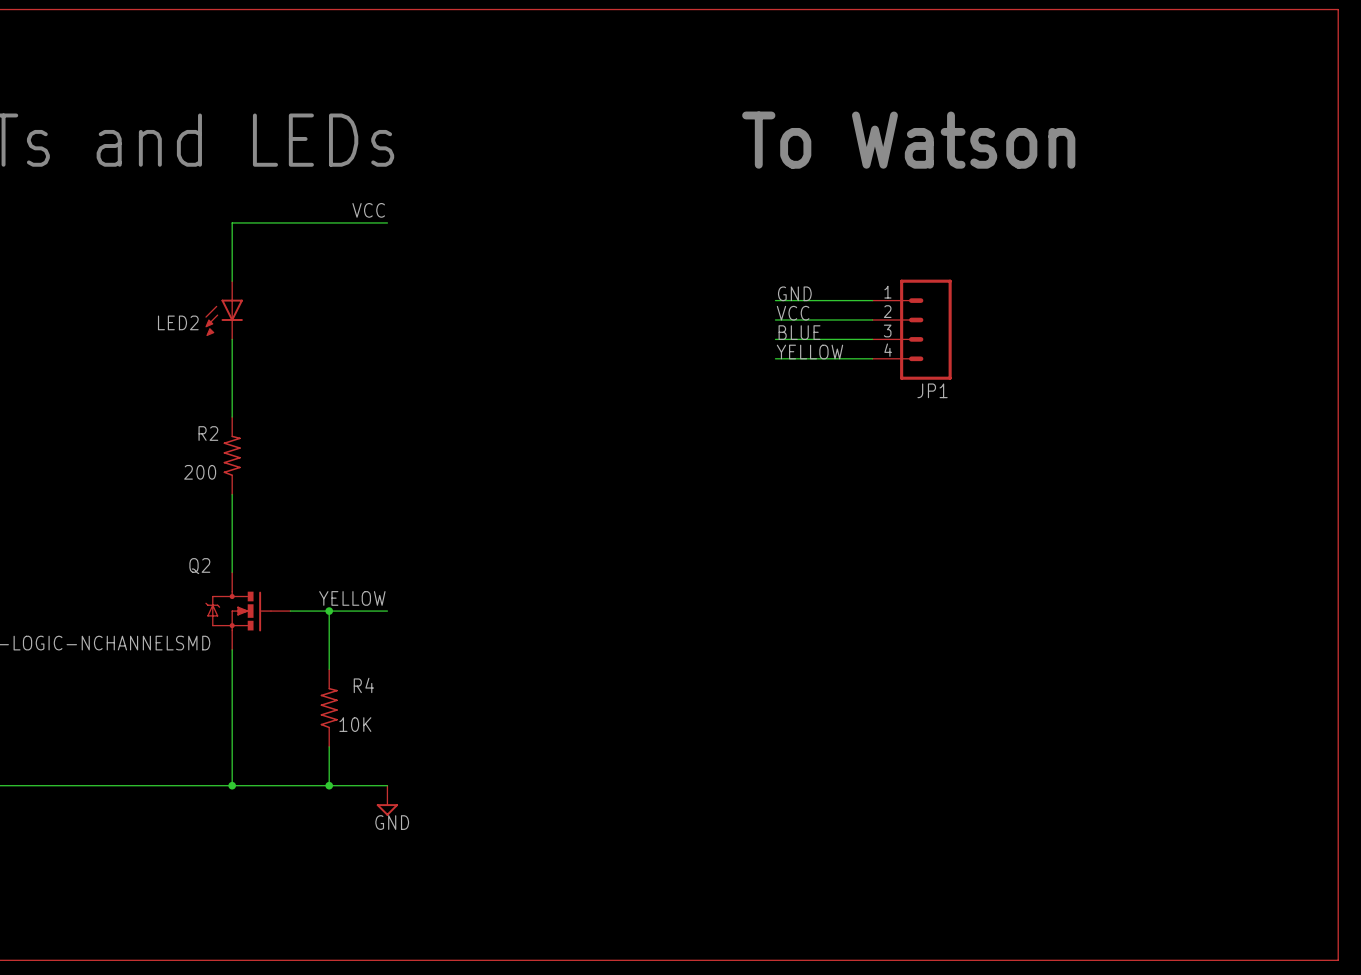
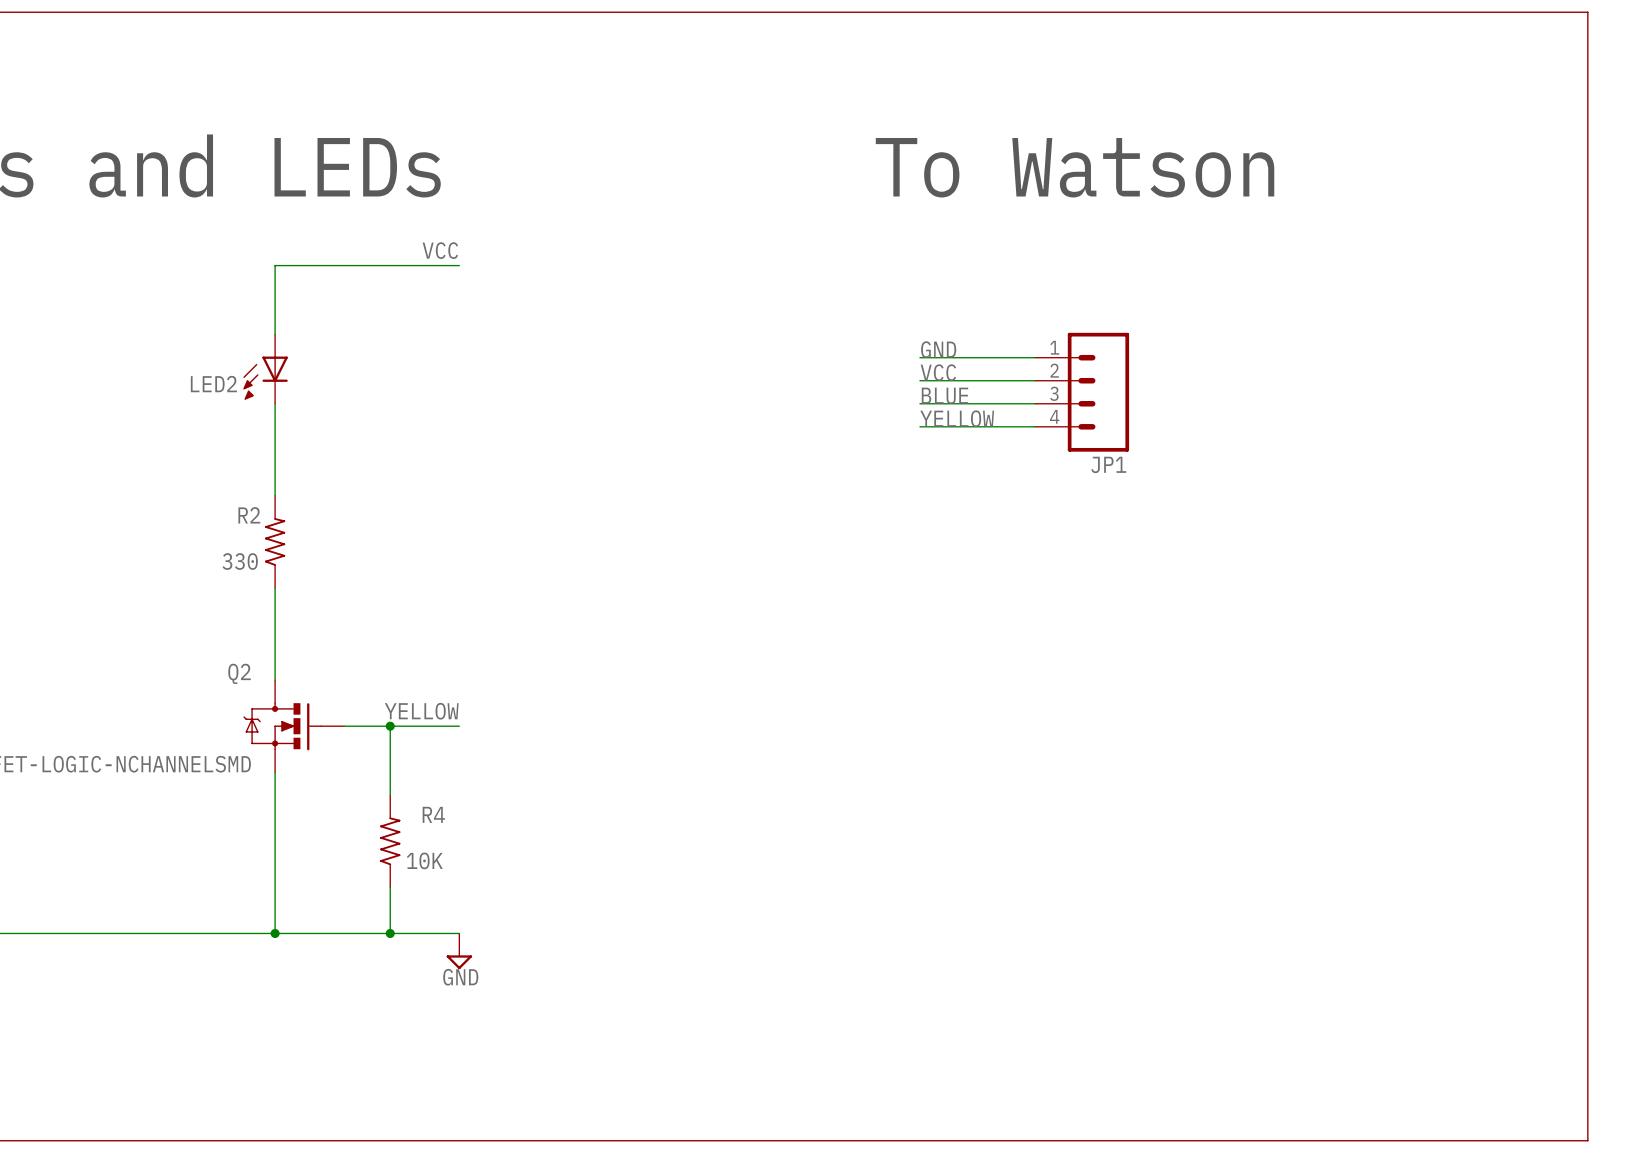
R2 value: 200 (200, 472) -> 330 (240, 561)

